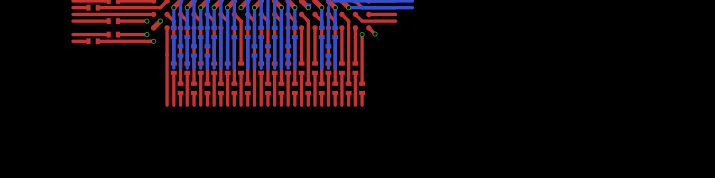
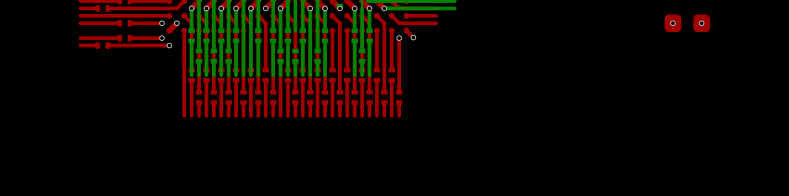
via: none -> (672, 23)
part: none -> (687, 23)
via: none -> (701, 23)

